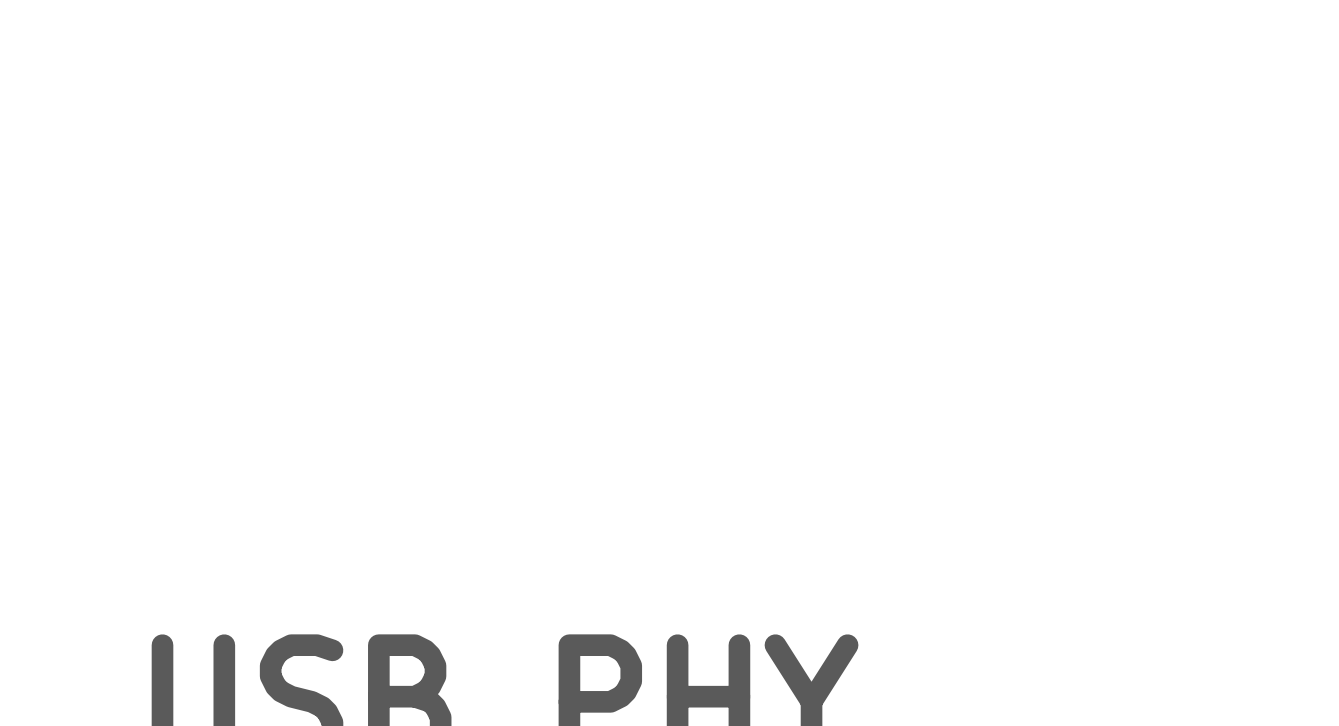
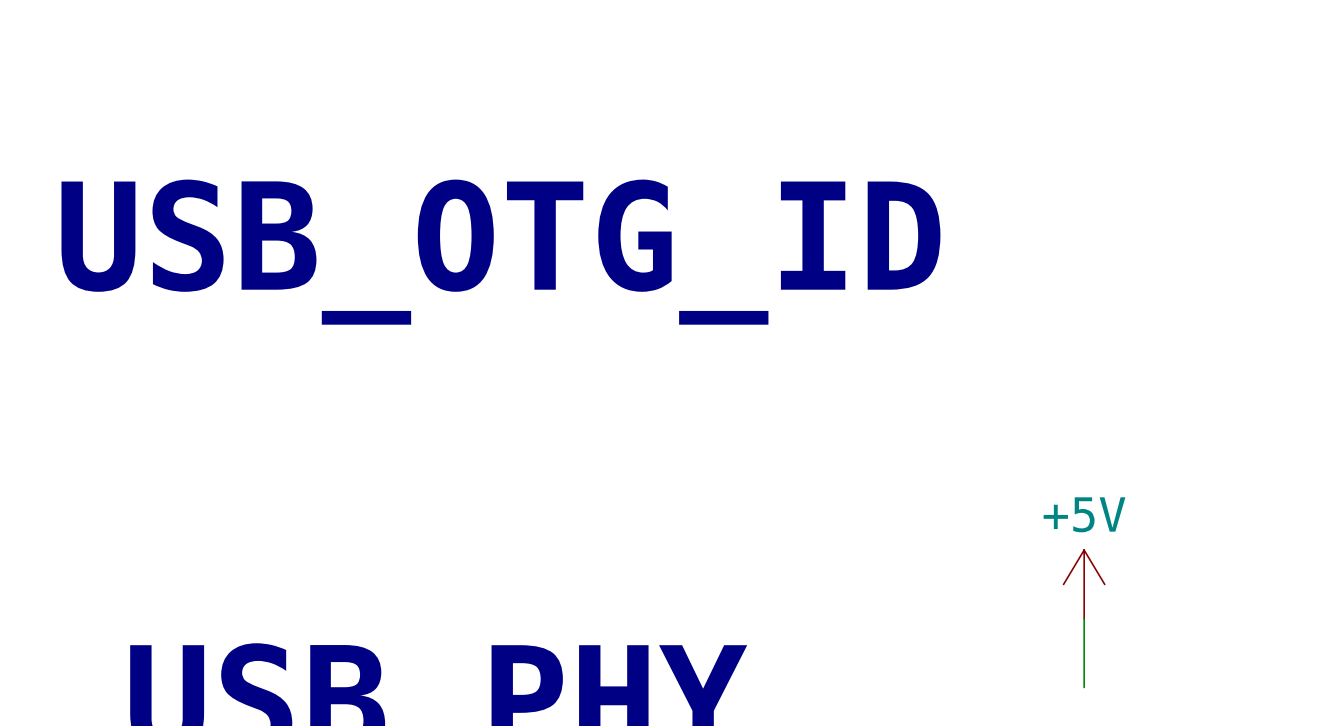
text: none -> USB_OTG_ID (500, 252)
power symbol: none -> +5V (1084, 584)
wire: none -> (1084, 618) (1084, 687)

